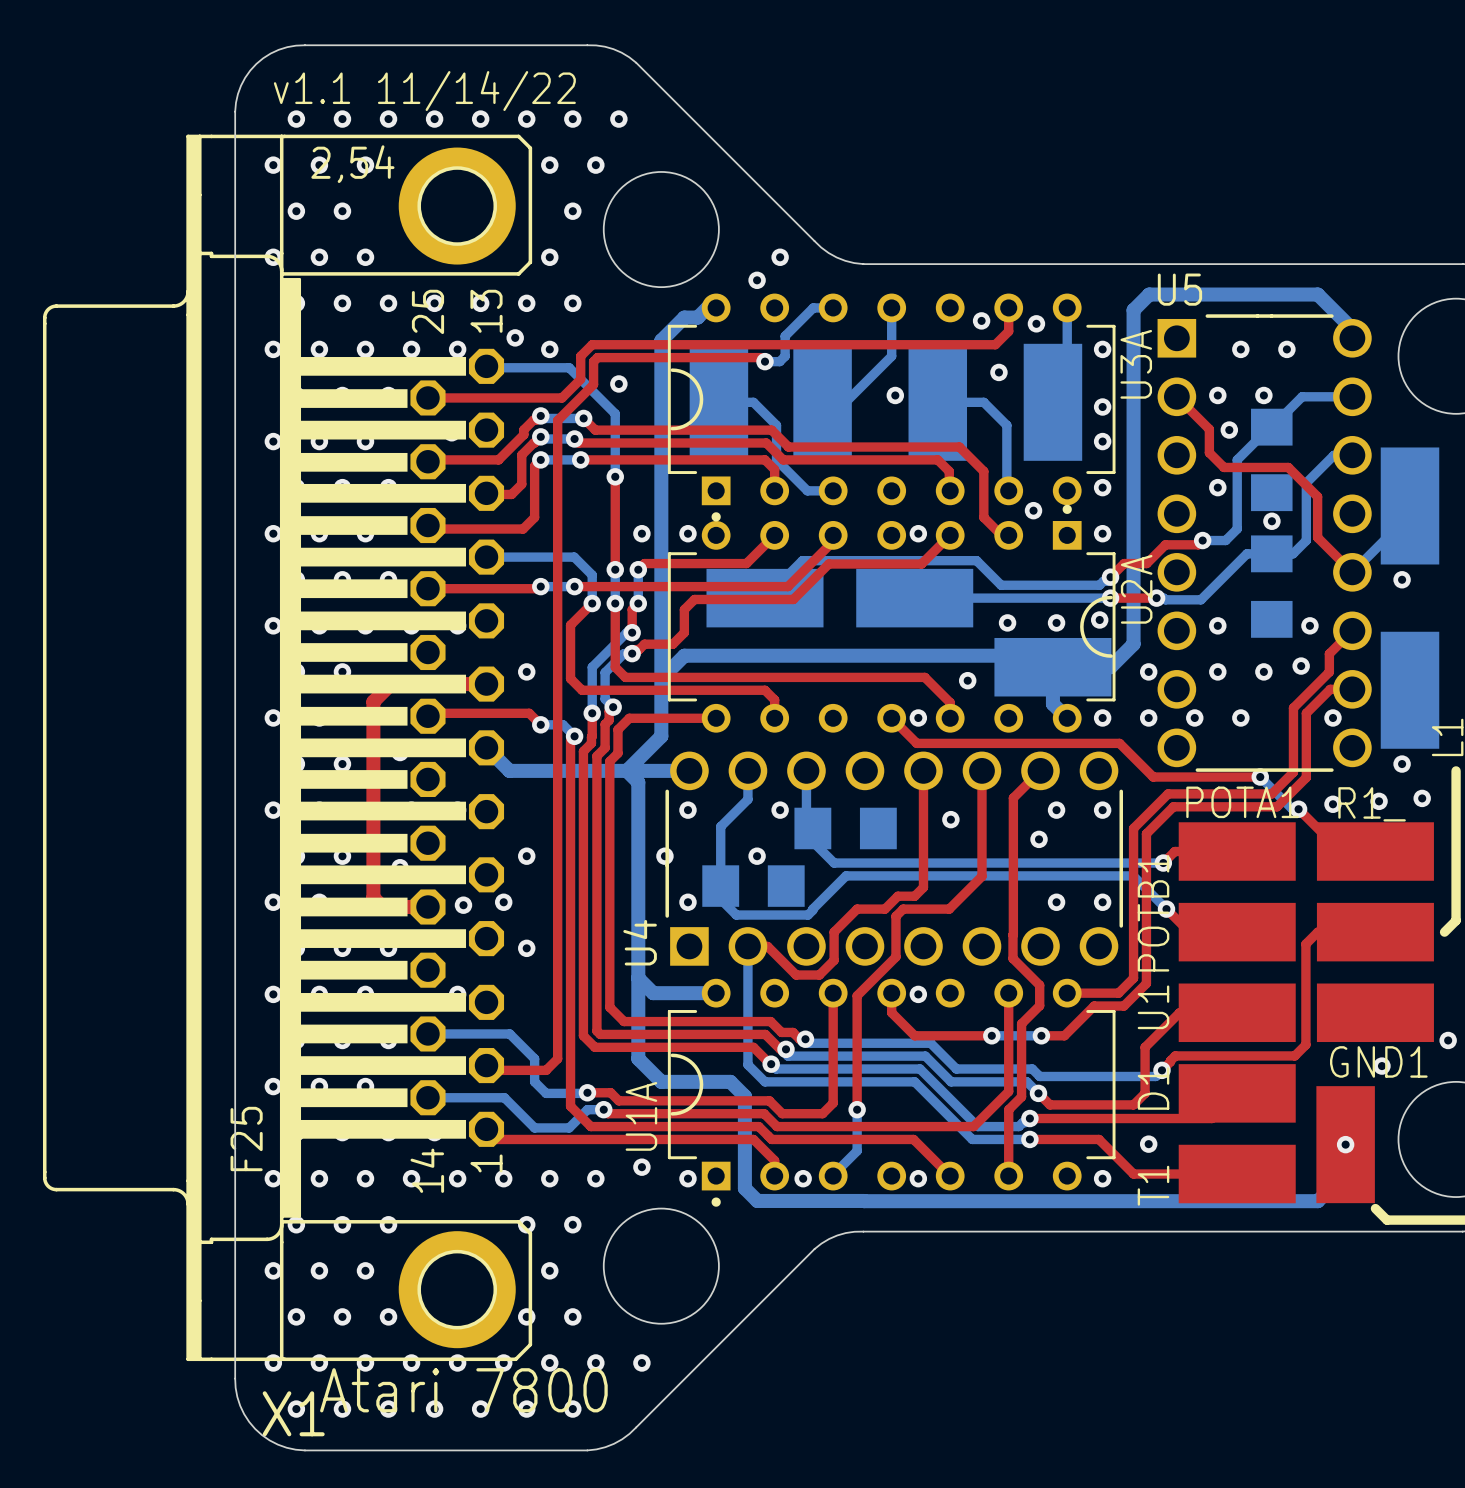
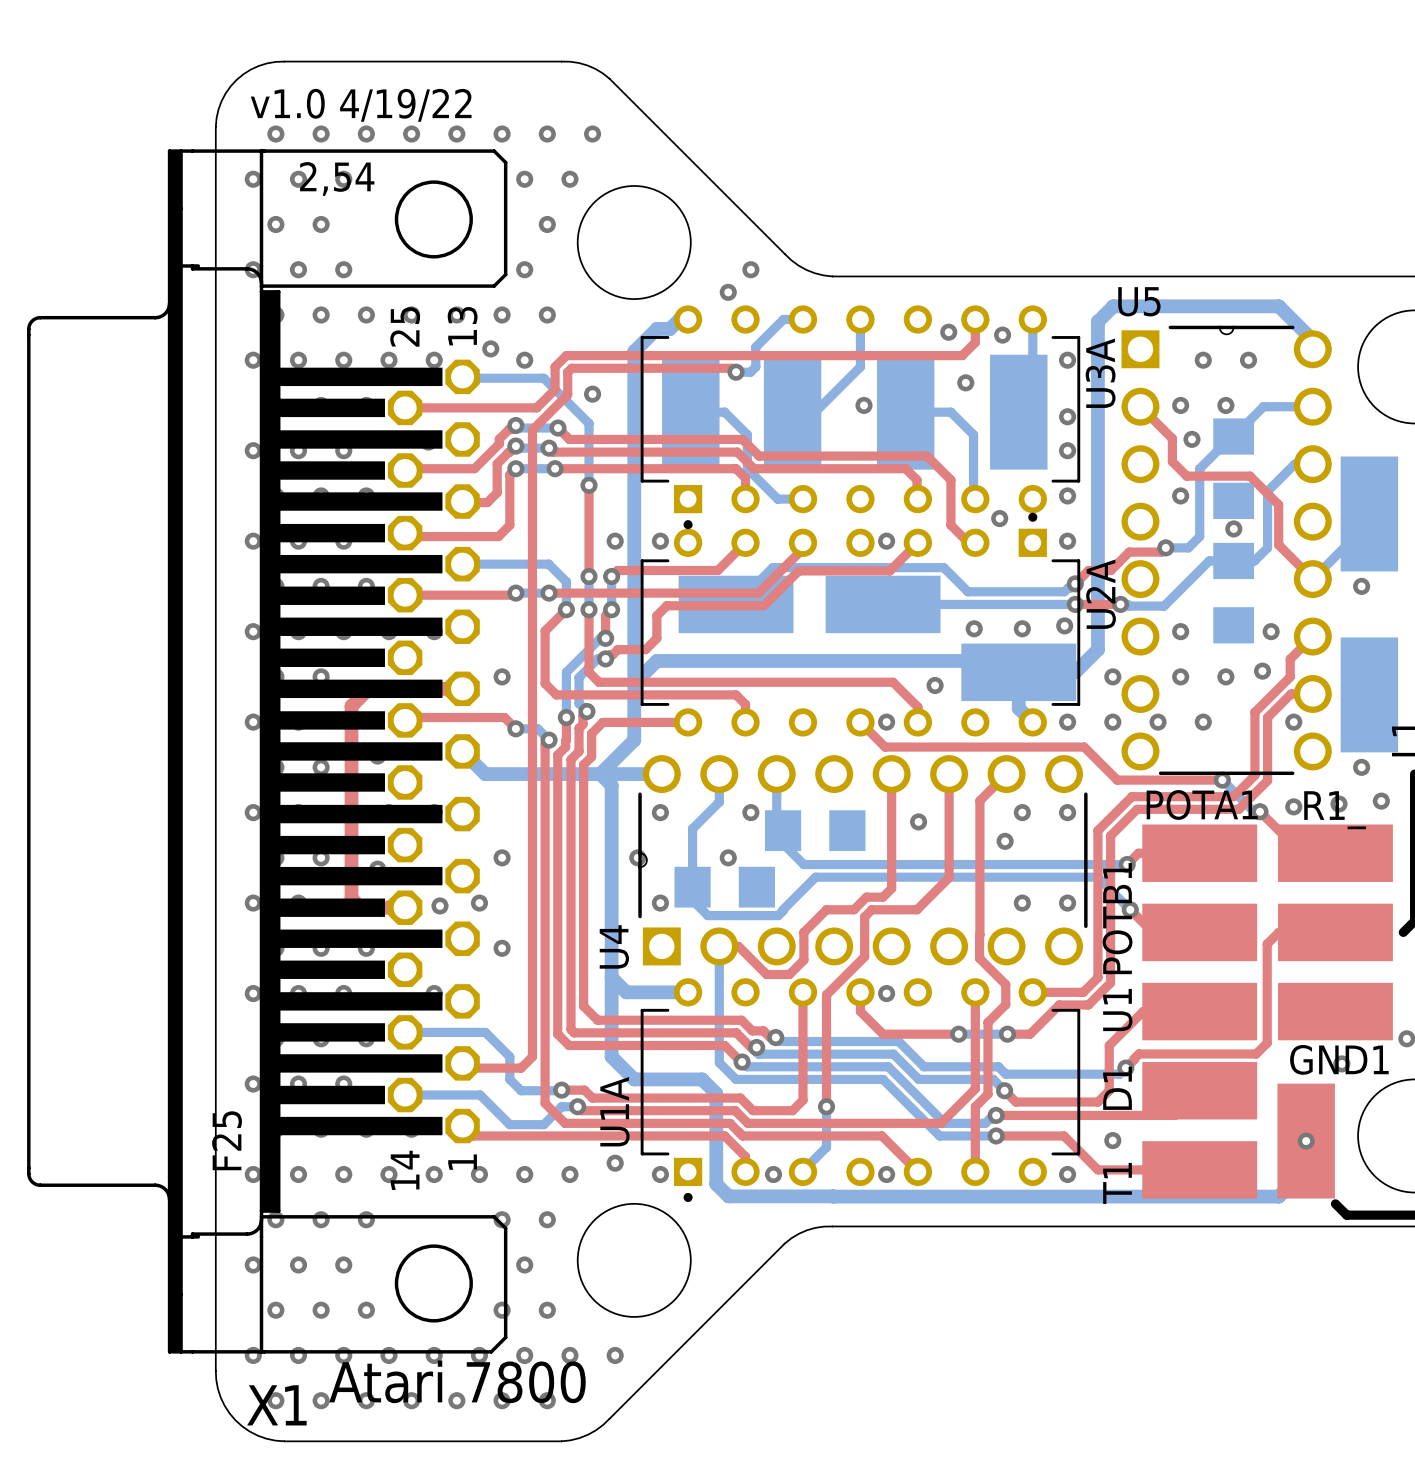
text: v1.1 11/14/22 (424, 91) -> v1.0 4/19/22 (361, 105)
X1 footprint: [42, 134, 533, 1362] -> [27, 149, 508, 1354]
U3A footprint: [667, 293, 1116, 522] -> [640, 305, 1081, 530]
U5 footprint: [1157, 314, 1372, 772] -> [1121, 325, 1332, 776]
U2A footprint: [667, 504, 1116, 733] -> [640, 512, 1081, 737]
U4 footprint: [665, 751, 1124, 966] -> [638, 755, 1088, 966]
U1A footprint: [667, 978, 1116, 1207] -> [640, 978, 1081, 1203]

